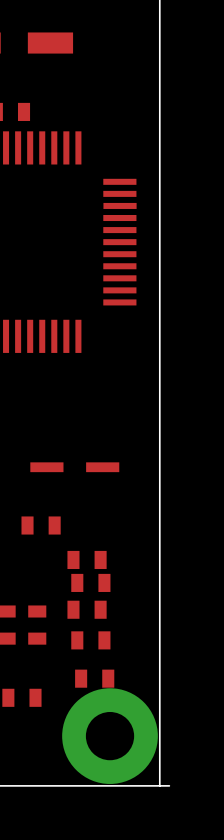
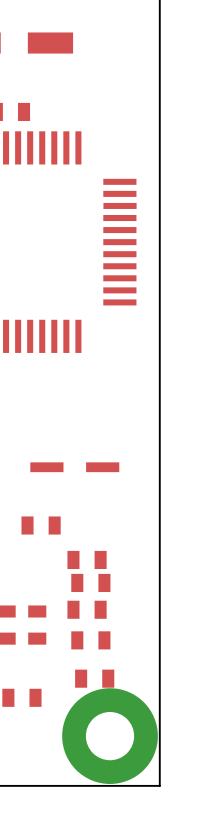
board edge: (169, 785) (159, 785) -> none

